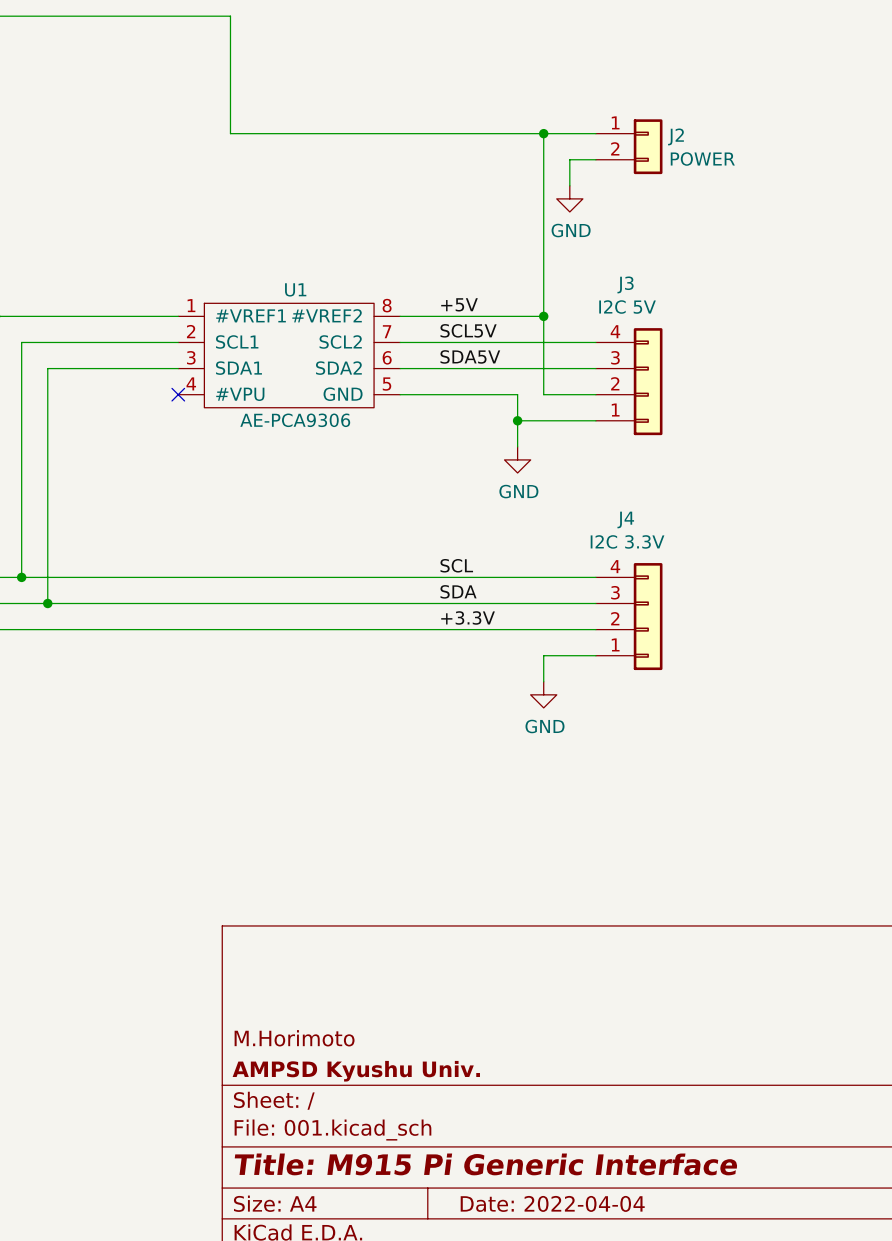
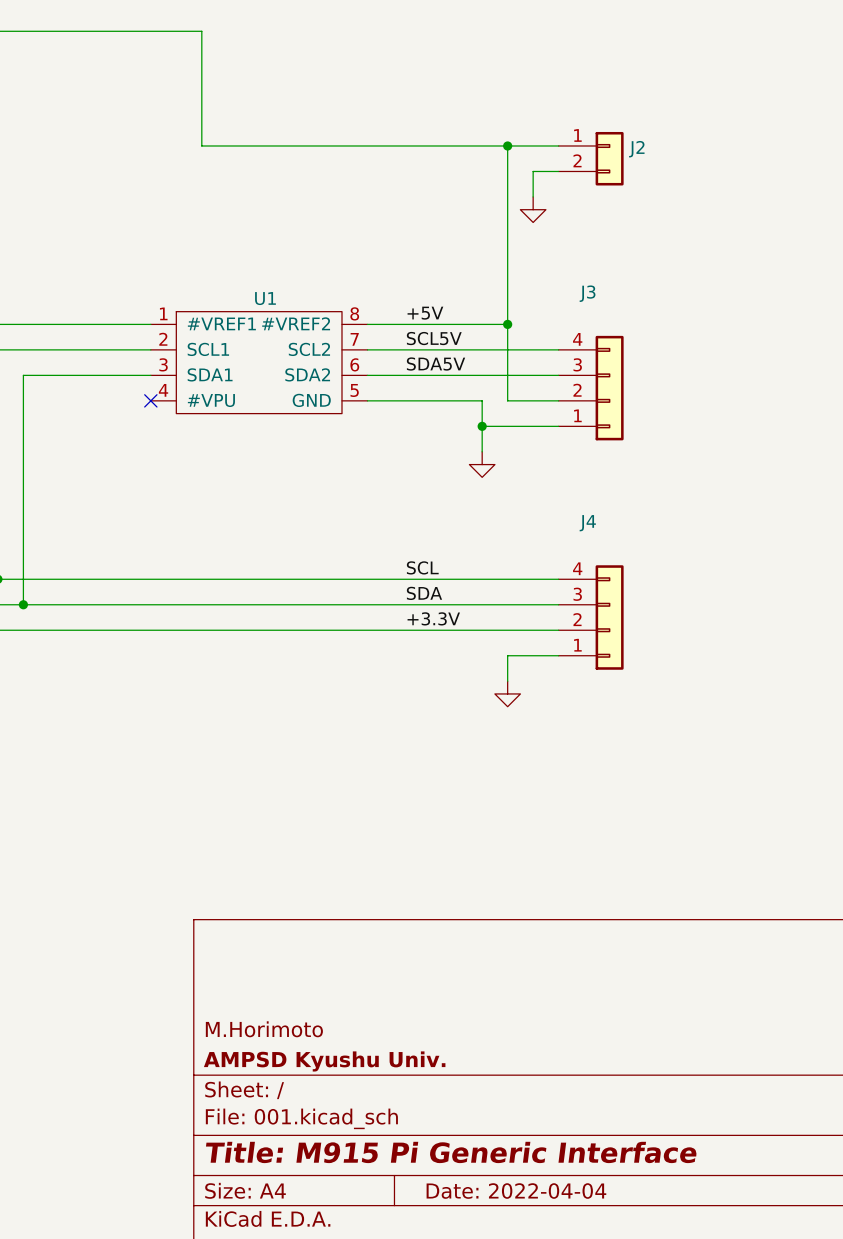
J2 value: POWER (702, 159) -> none
power symbol text: GND (571, 230) -> none
J3 value: I2C 5V (627, 307) -> none
U1 value: AE-PCA9306 (295, 420) -> none
power symbol text: GND (518, 491) -> none
J4 value: I2C 3.3V (627, 541) -> none
power symbol text: GND (544, 726) -> none

